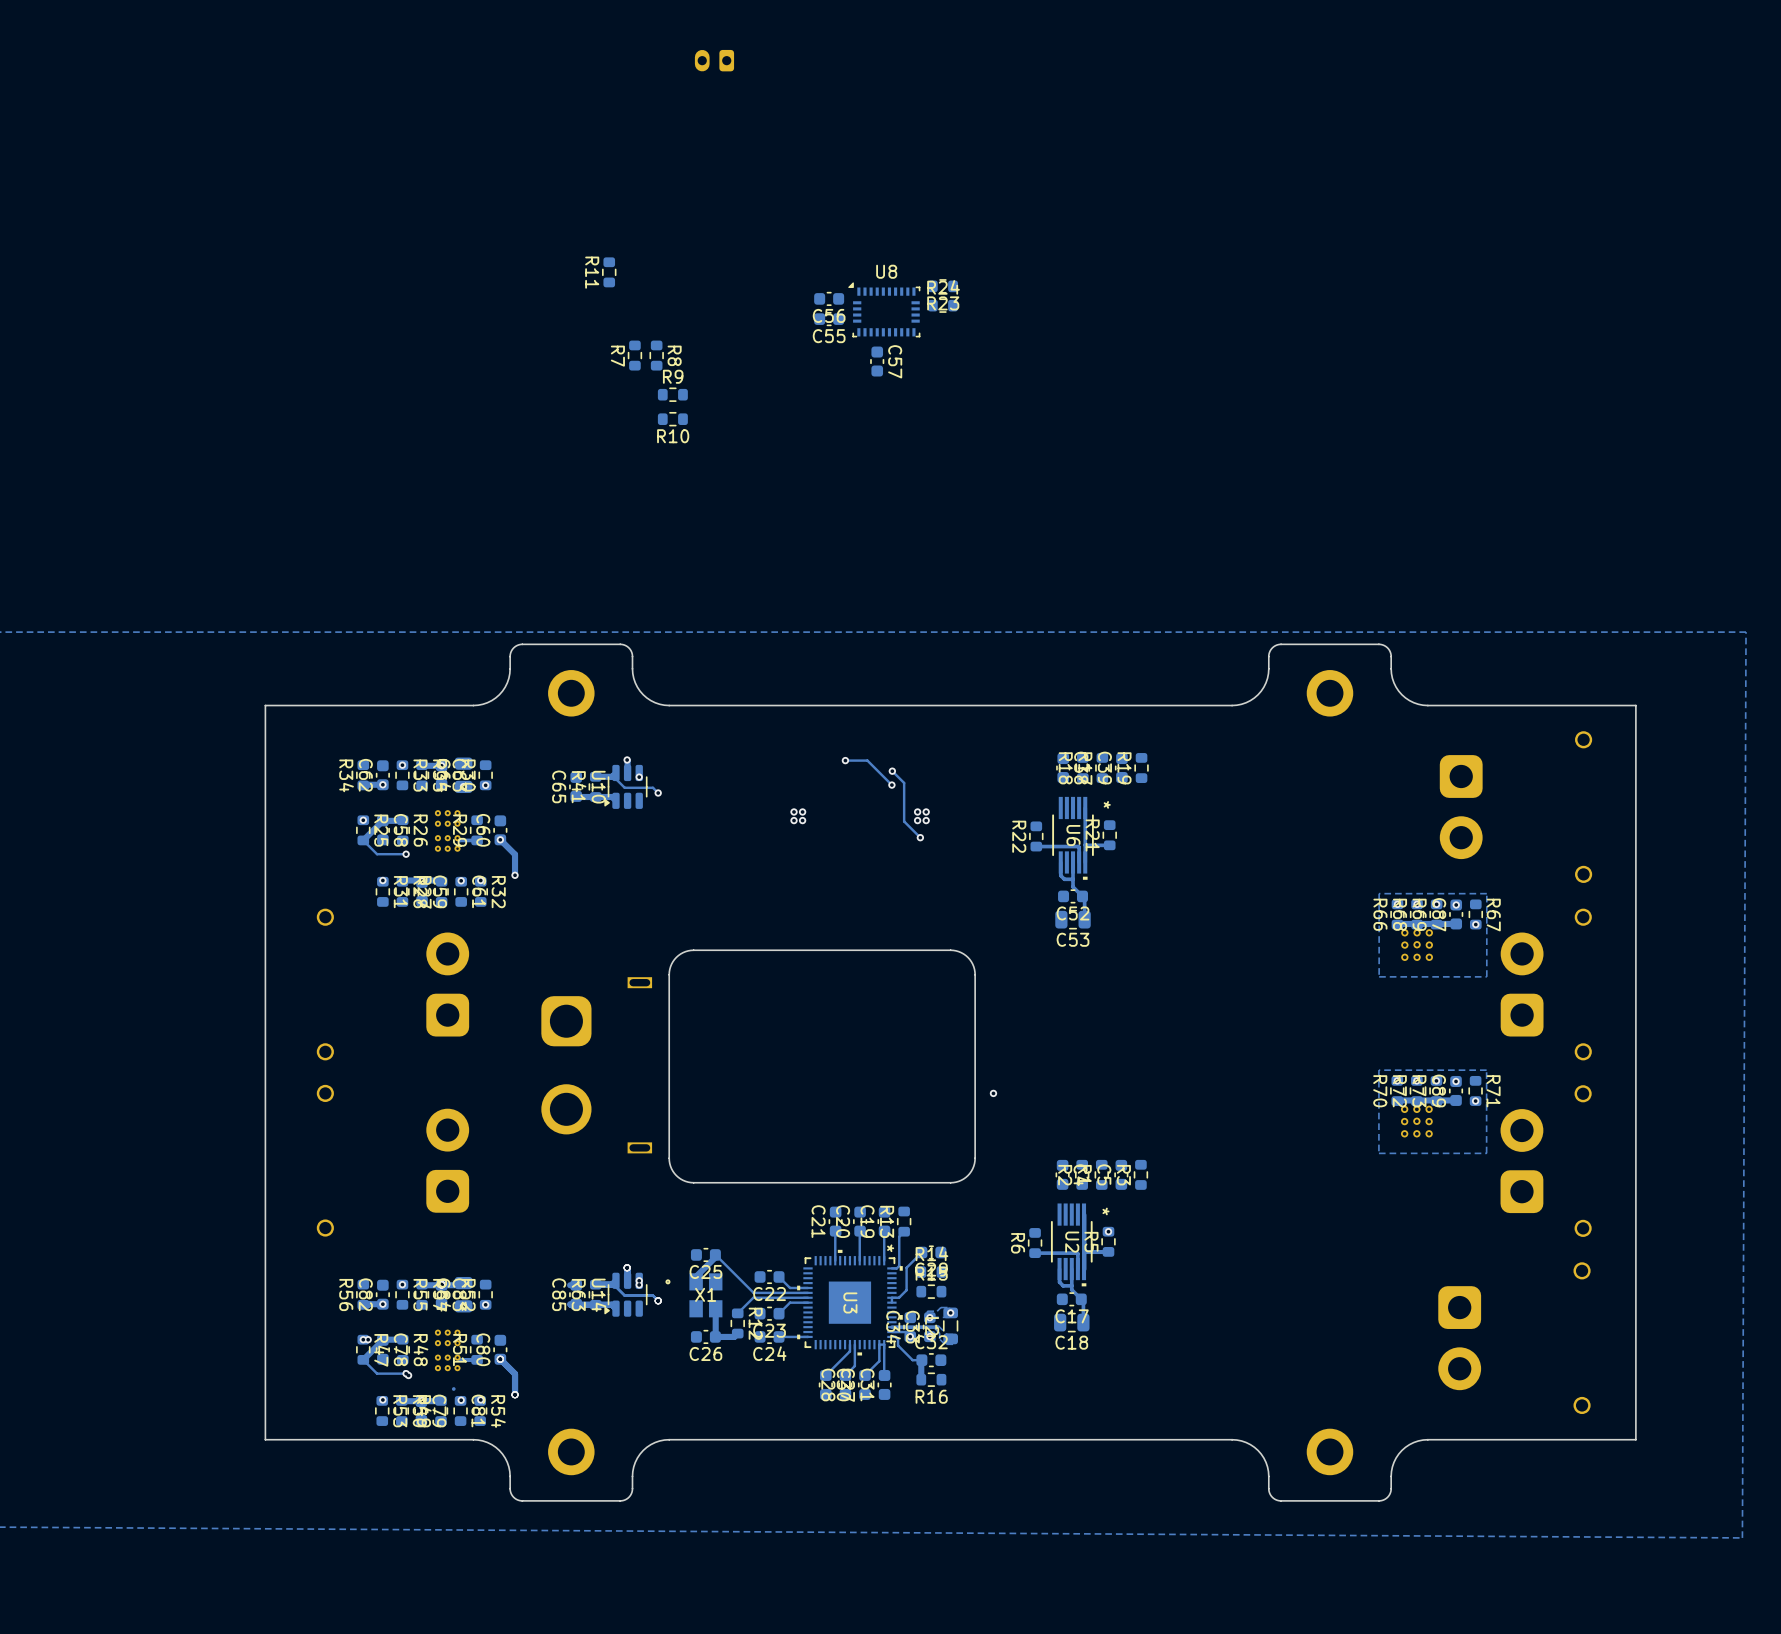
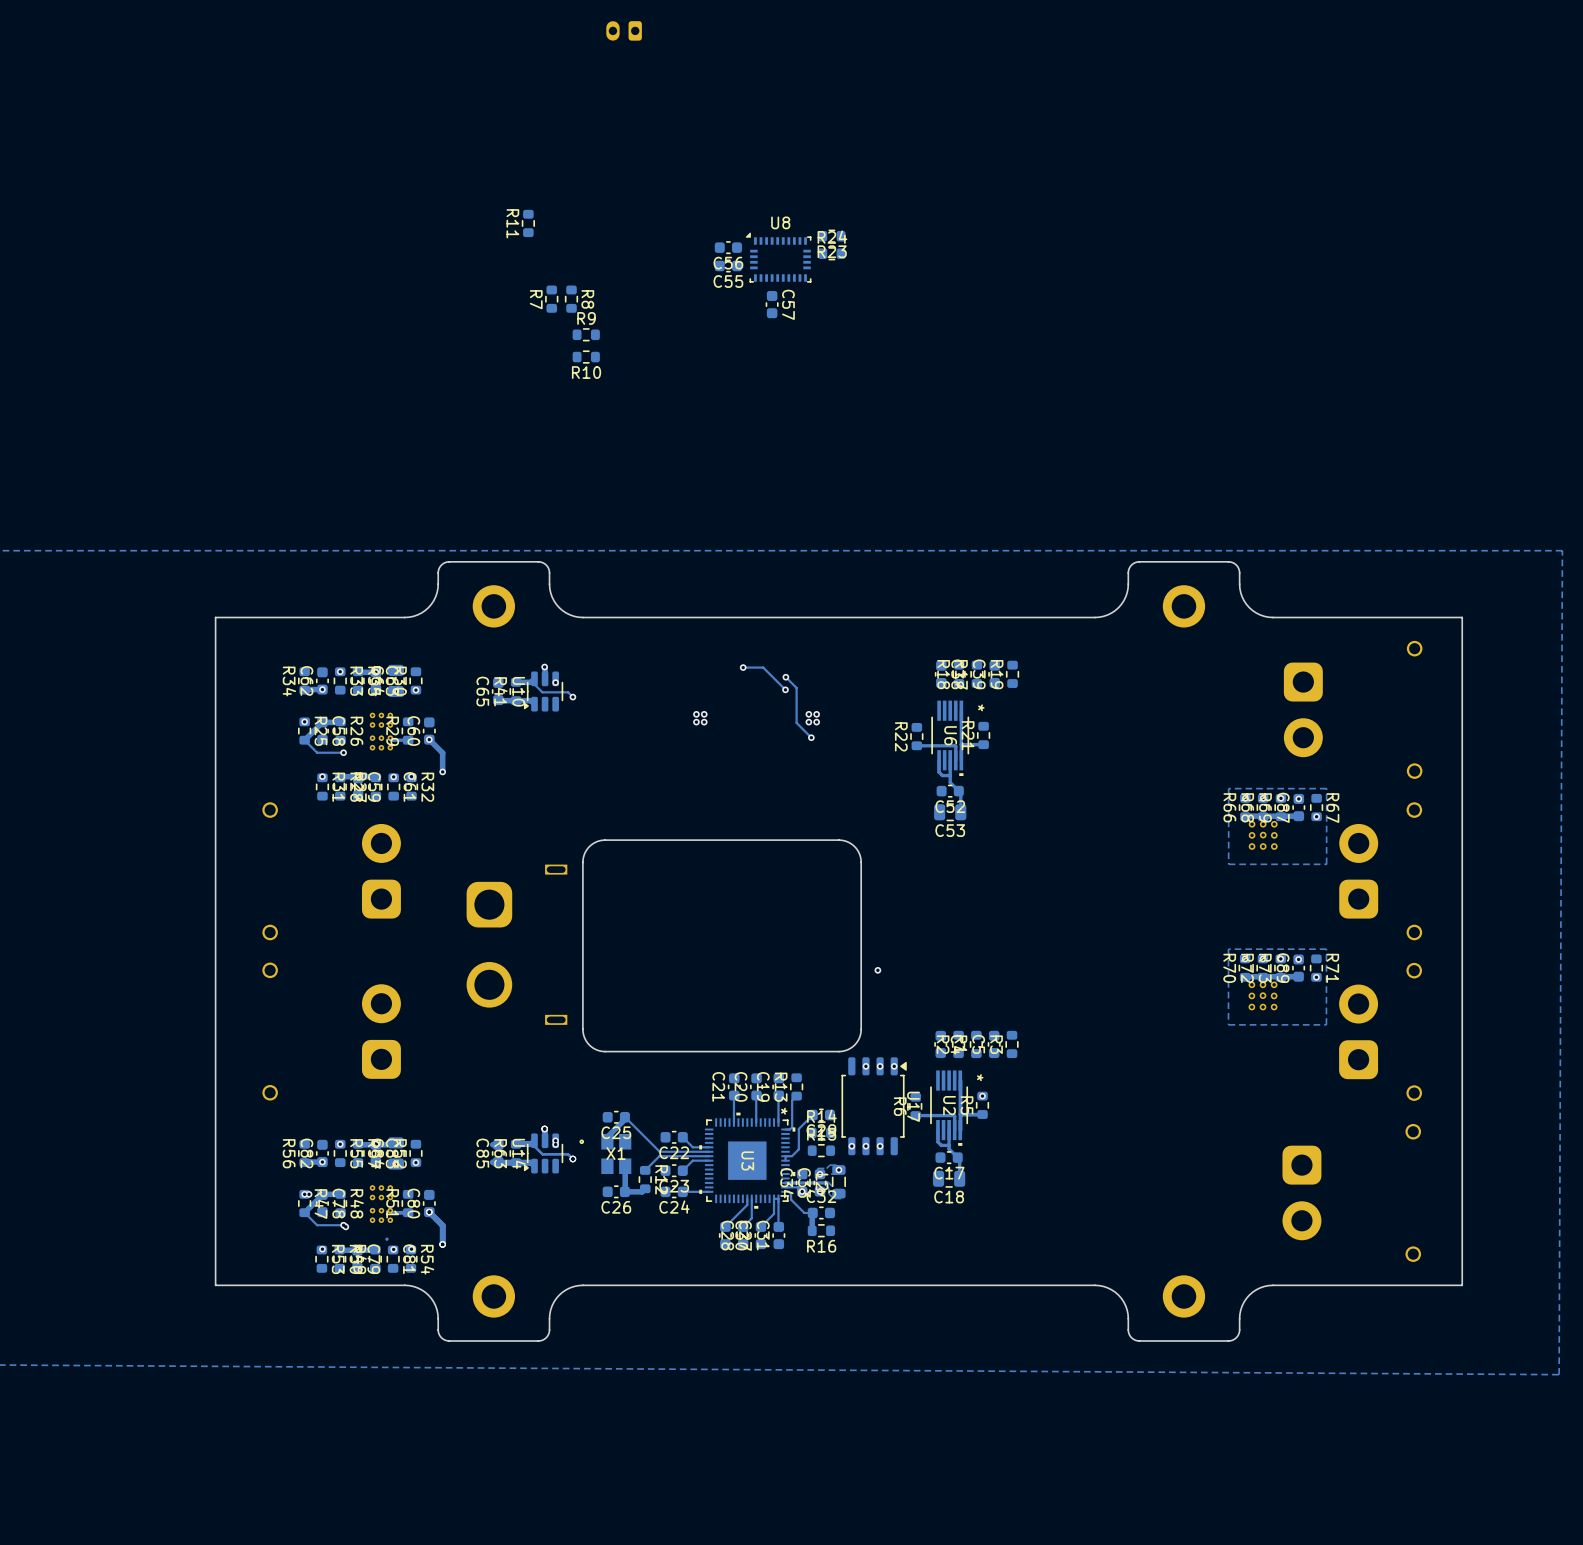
via: none -> (865, 1066)
via: none -> (880, 1066)
via: none -> (894, 1066)
U17: none -> (874, 1106)
via: none -> (851, 1146)
via: none -> (865, 1146)
via: none -> (880, 1146)

